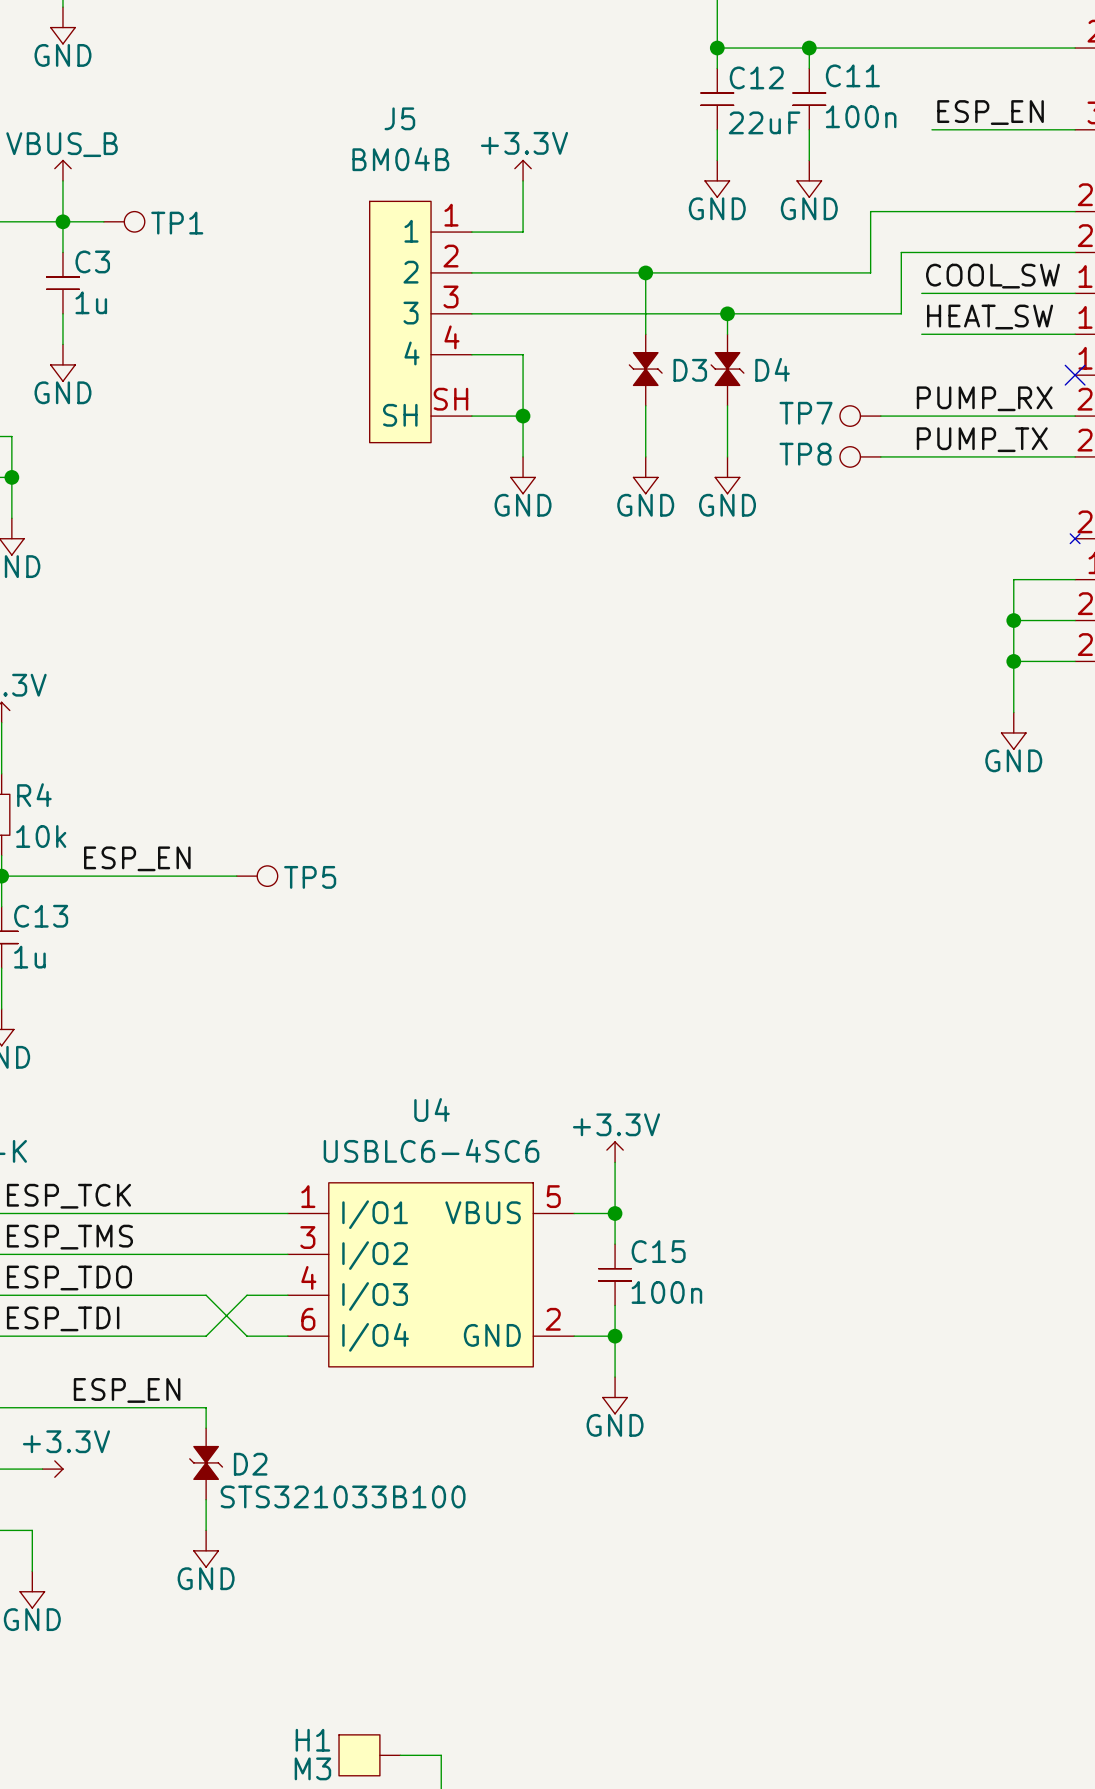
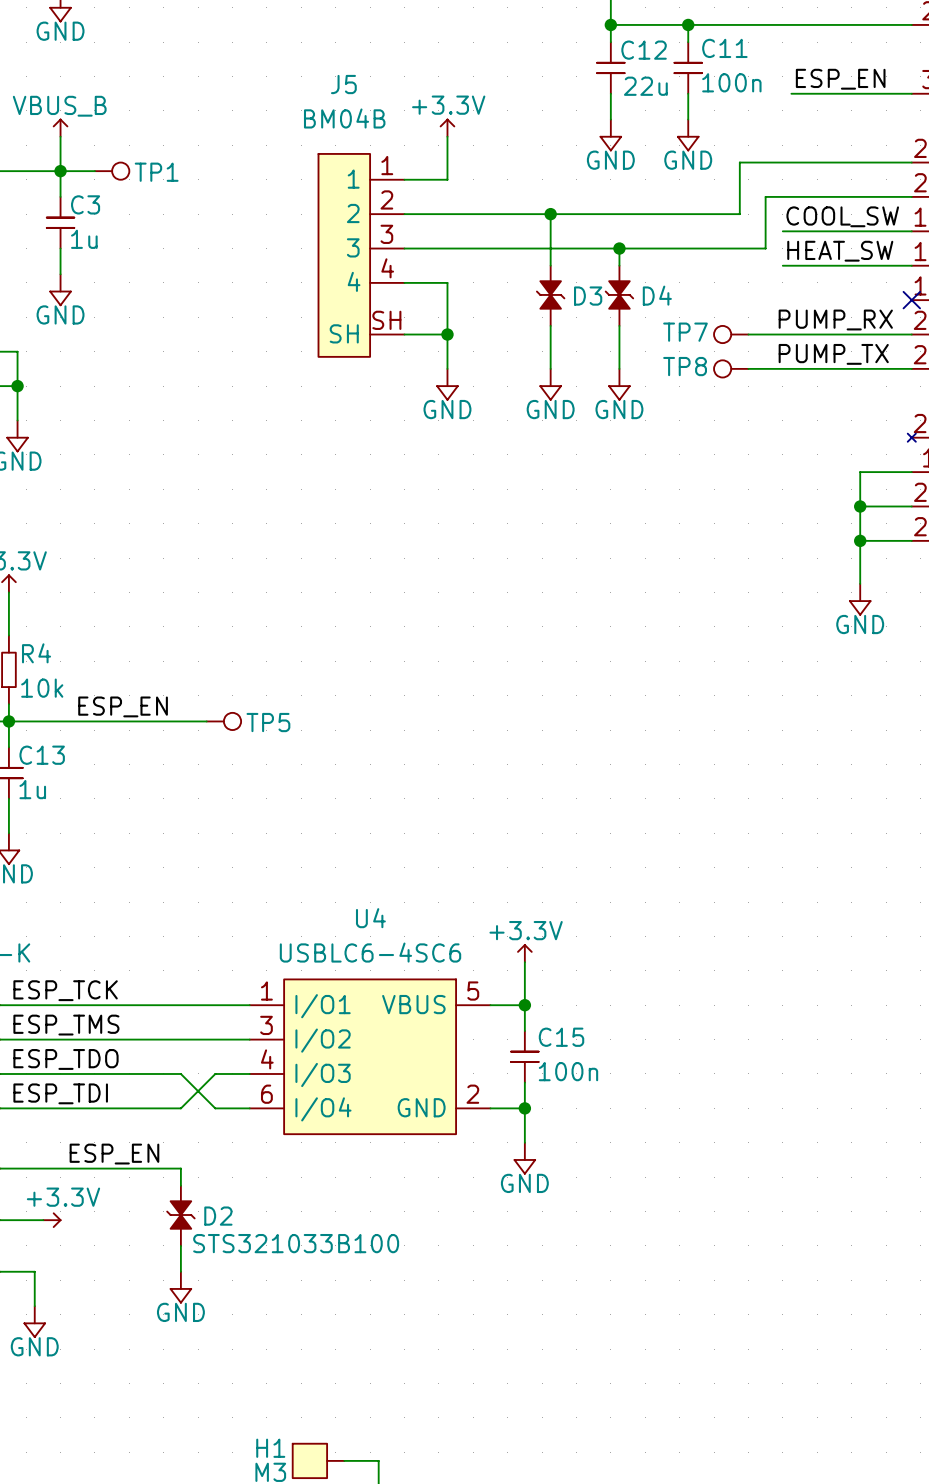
C12 value: 22uF (764, 122) -> 22u (645, 86)

